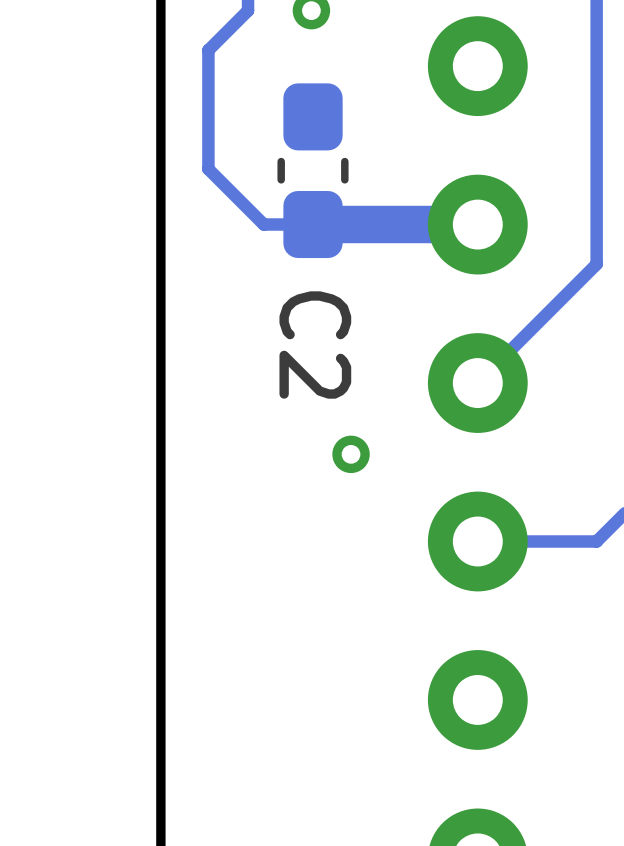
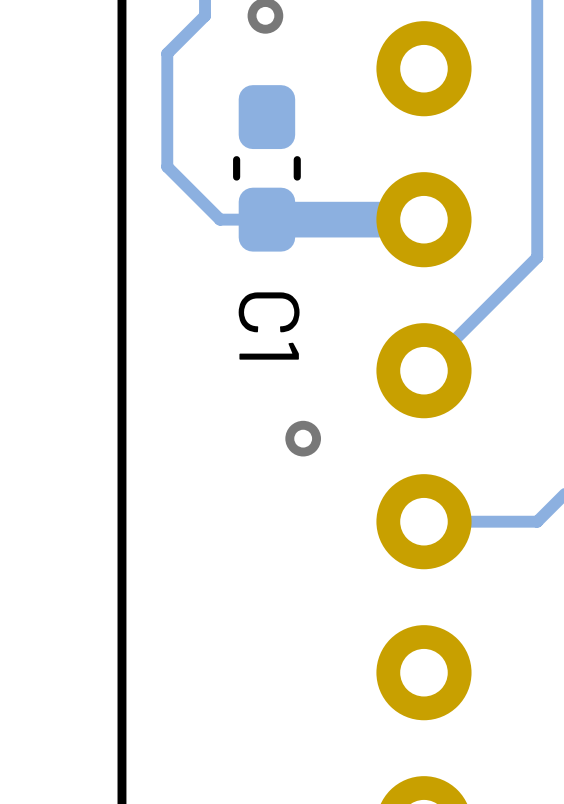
C2 name: C2 (315, 345) -> C1 (269, 326)

